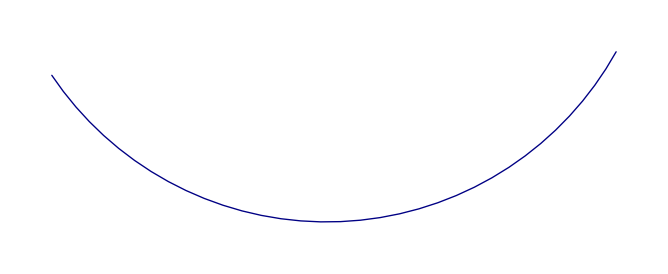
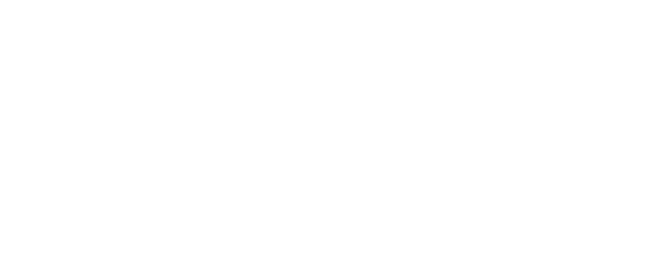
line: (616, 51) (594, 85) (555, 130) (525, 155) (491, 177) (456, 195) (418, 208) (380, 217) (340, 221) (300, 220) (261, 215) (222, 205) (186, 190) (151, 171) (103, 135) (75, 106) (51, 75) -> none

